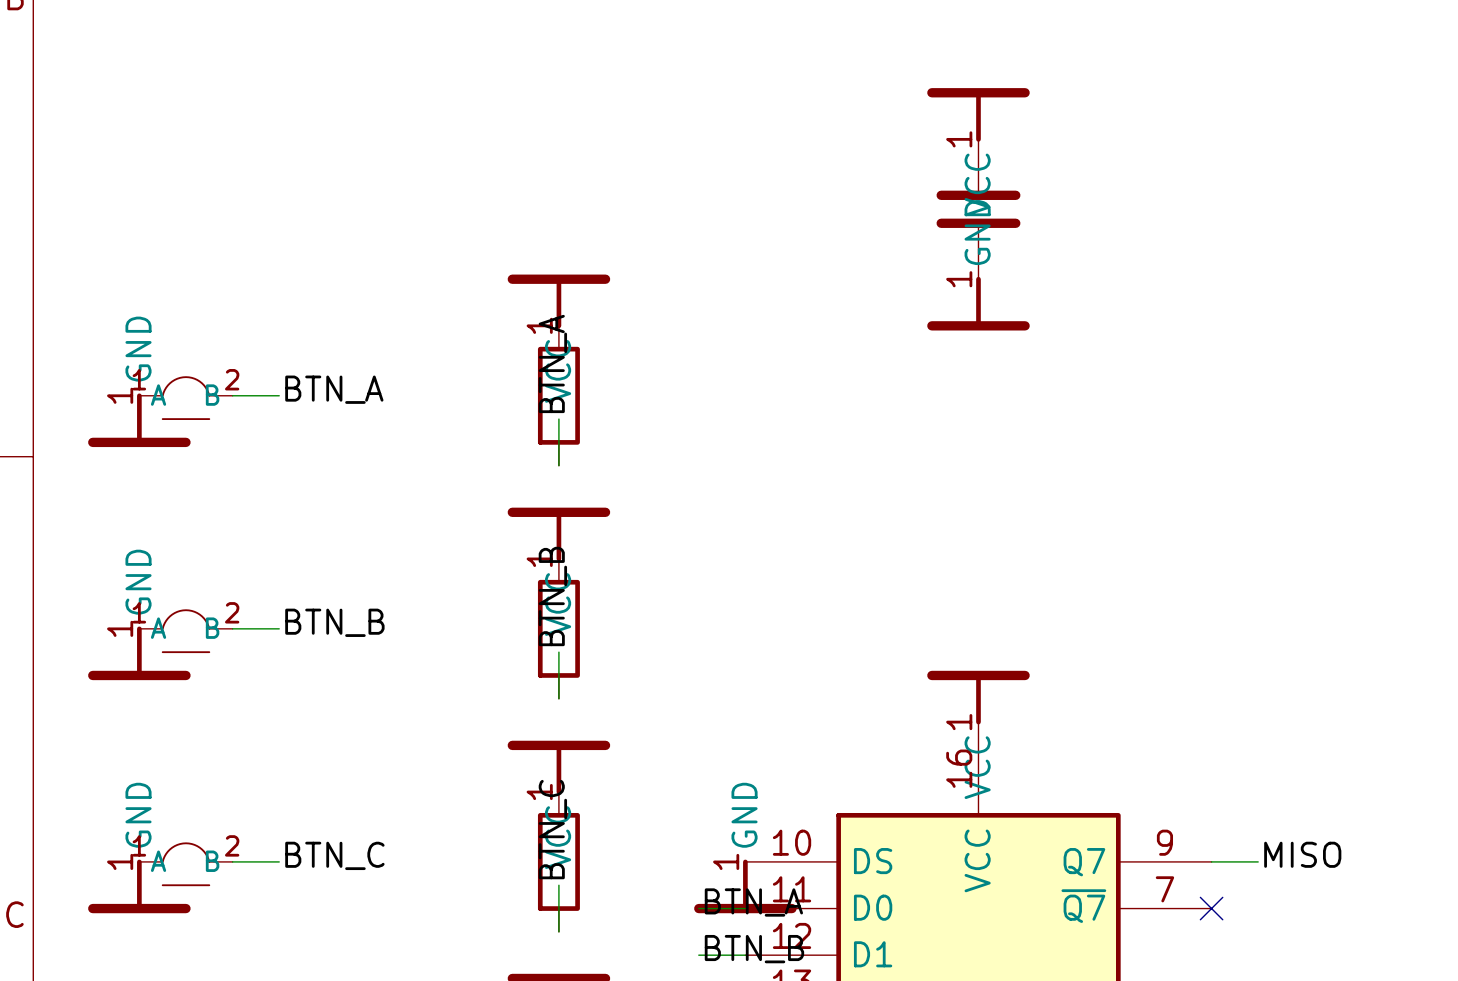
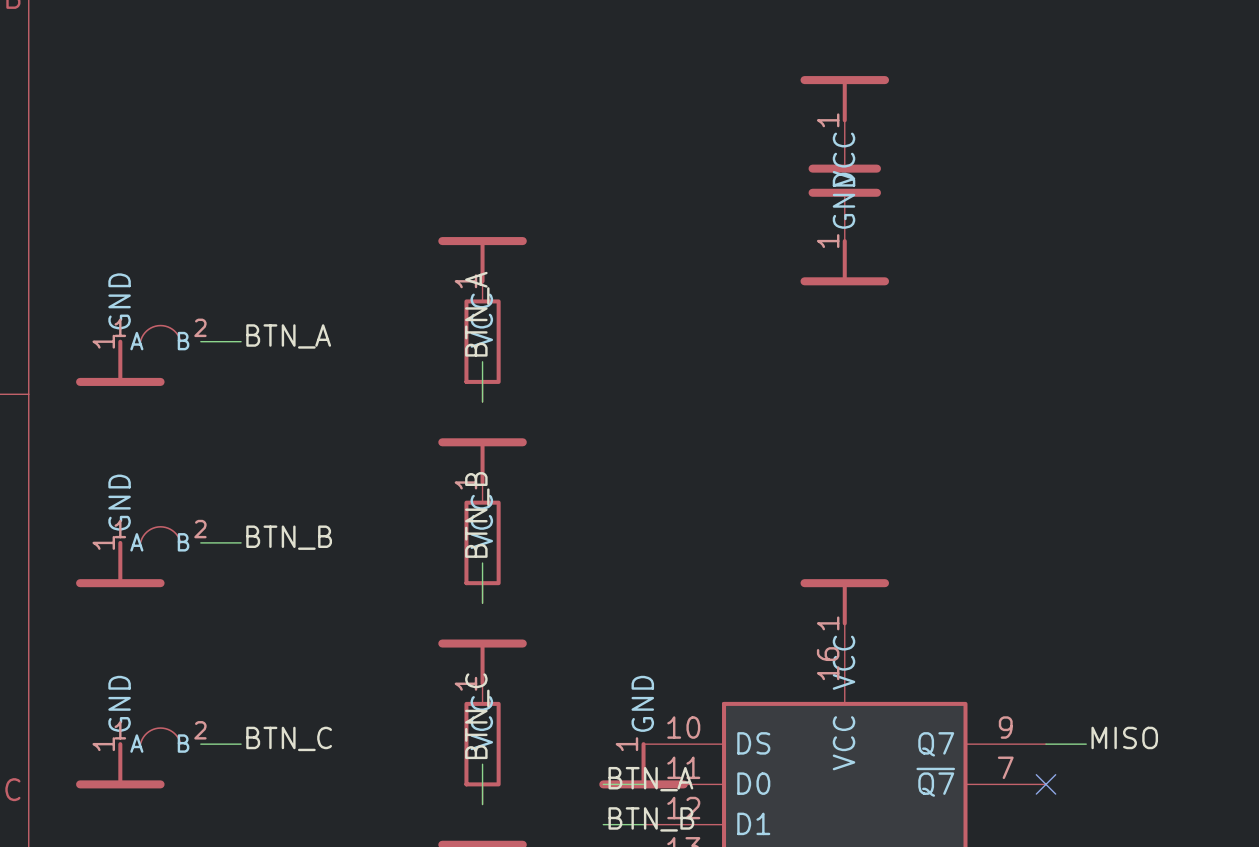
part symbol: [139, 376, 233, 420] -> [139, 324, 182, 343]
part symbol: [139, 609, 233, 654] -> [139, 526, 182, 544]
part symbol: [139, 842, 233, 887] -> [139, 727, 182, 745]

